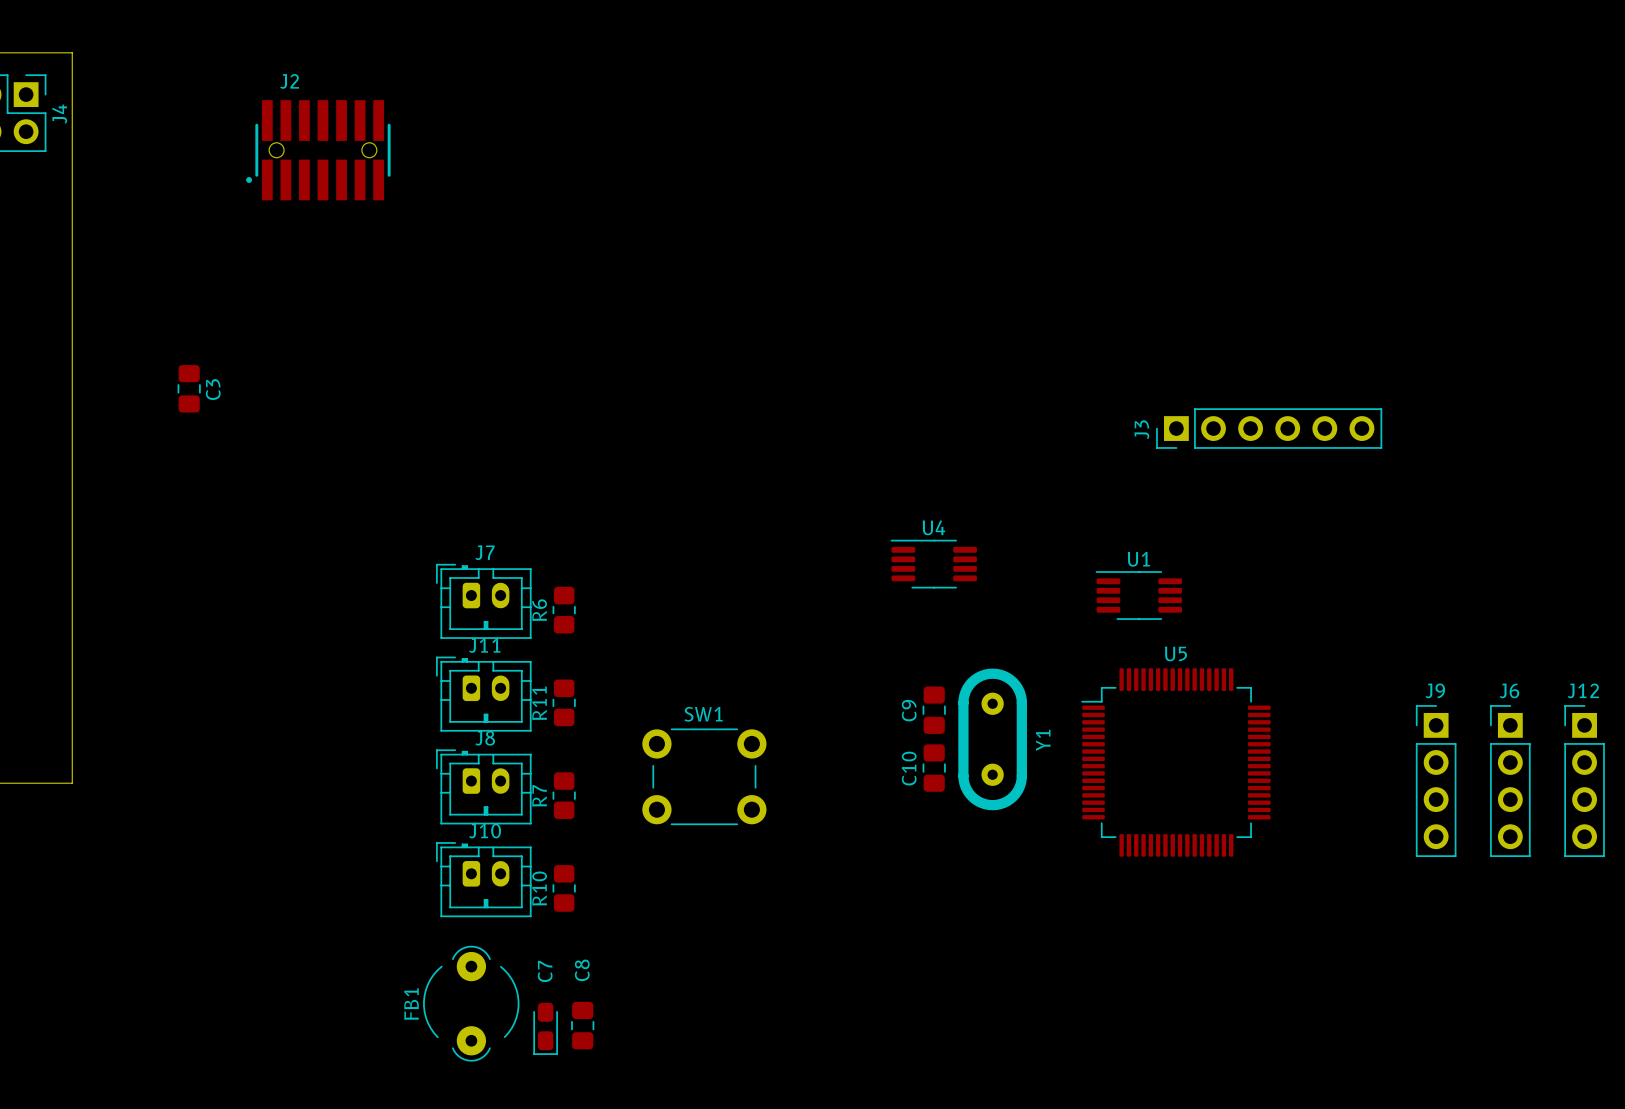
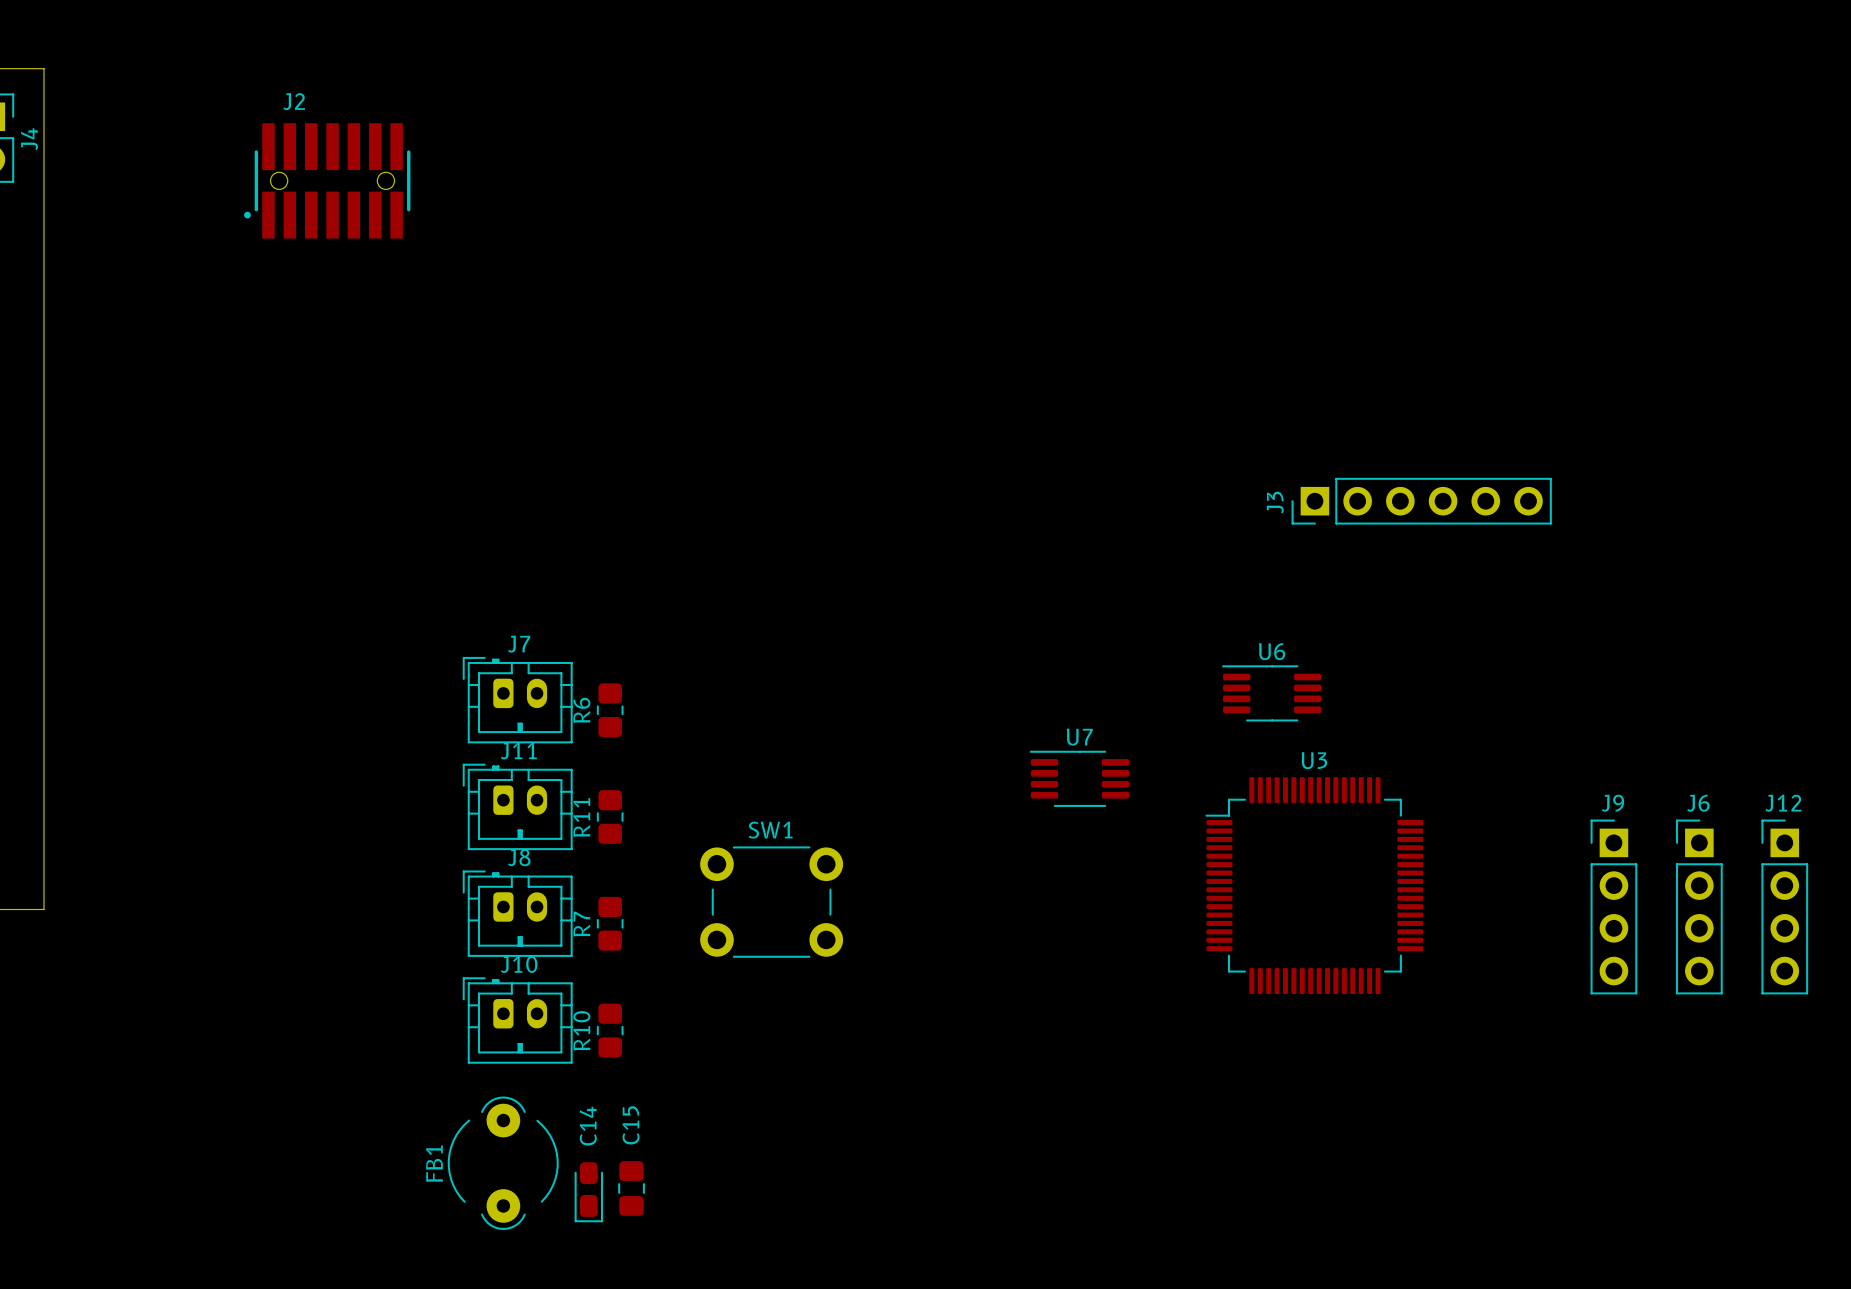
C3: (189, 388) -> none
U1 name: U1 (1138, 559) -> U6 (1272, 651)
U4: (933, 564) -> none
U5 name: U5 (1175, 653) -> U3 (1314, 760)
U7: none -> (1079, 778)
C9: (934, 710) -> none
Y1: (992, 739) -> none
C10: (934, 768) -> none
C8 name: C8 (582, 970) -> C15 (630, 1125)
C7 name: C7 (545, 971) -> C14 (588, 1126)

